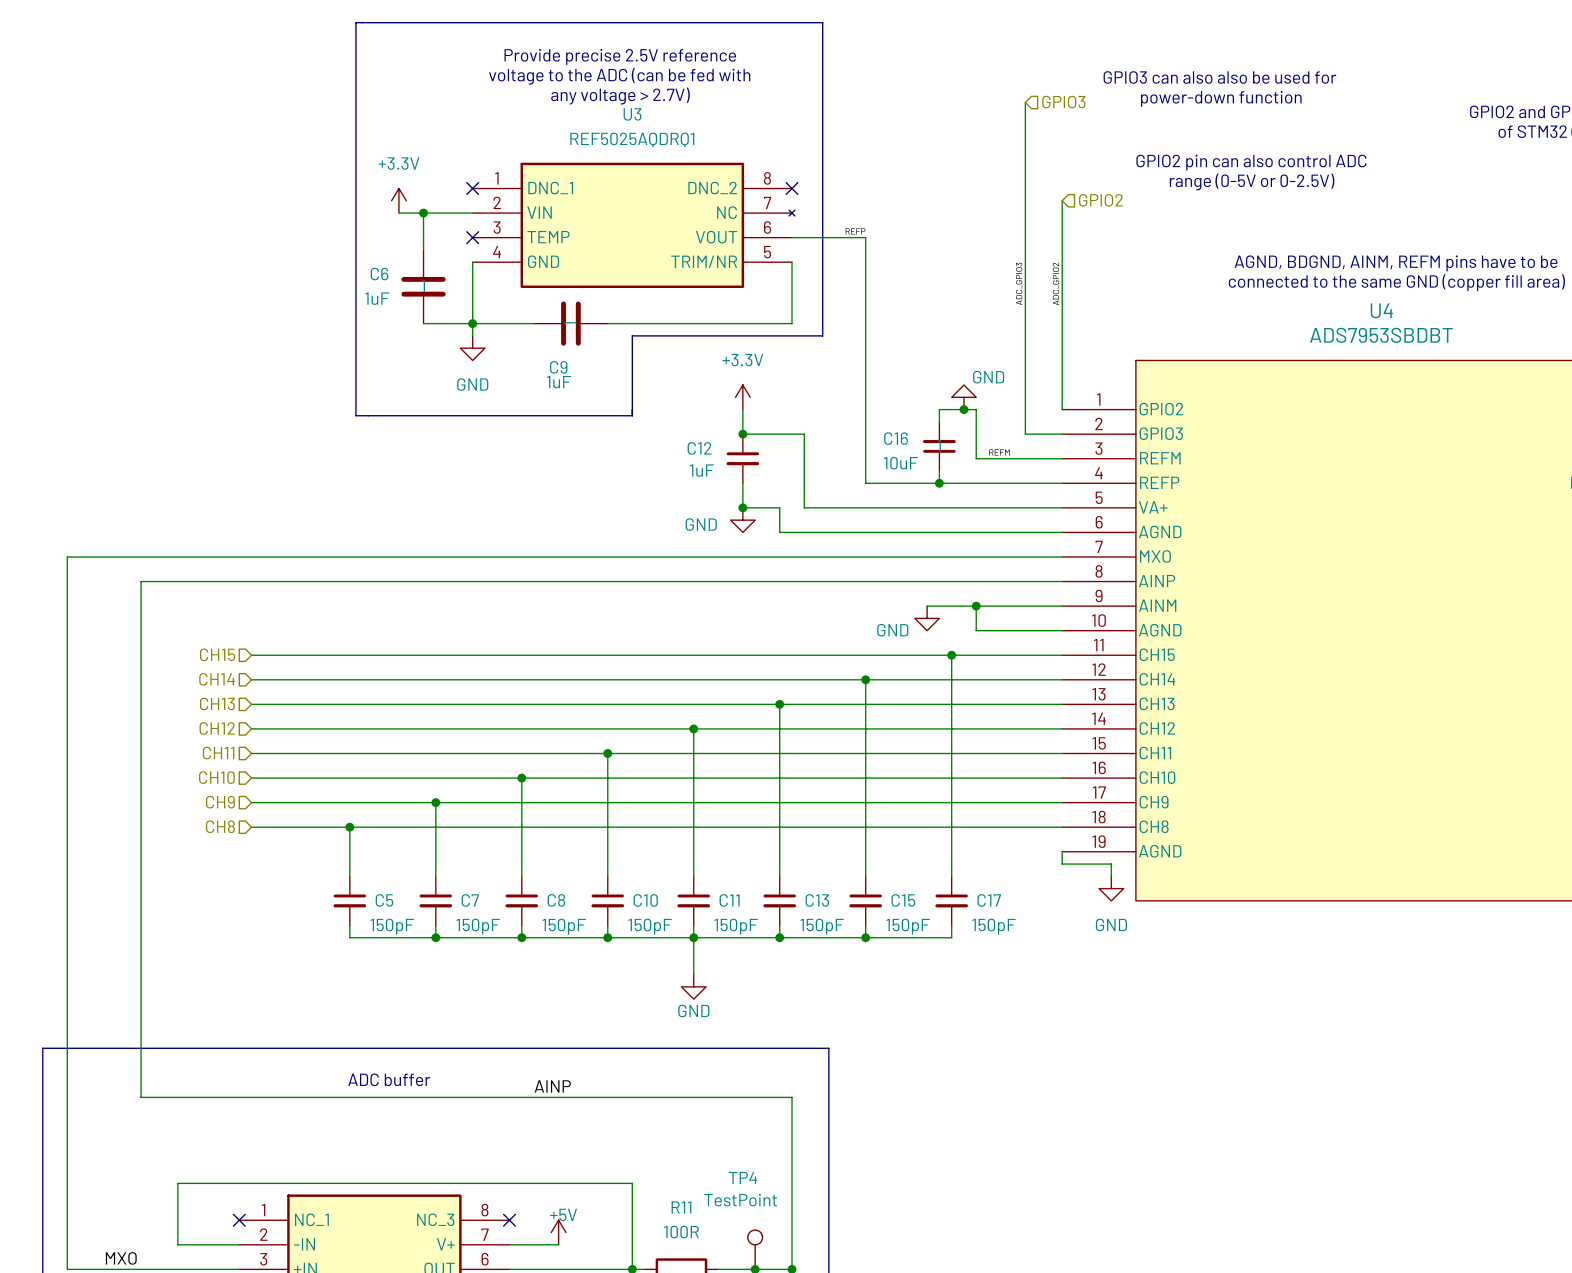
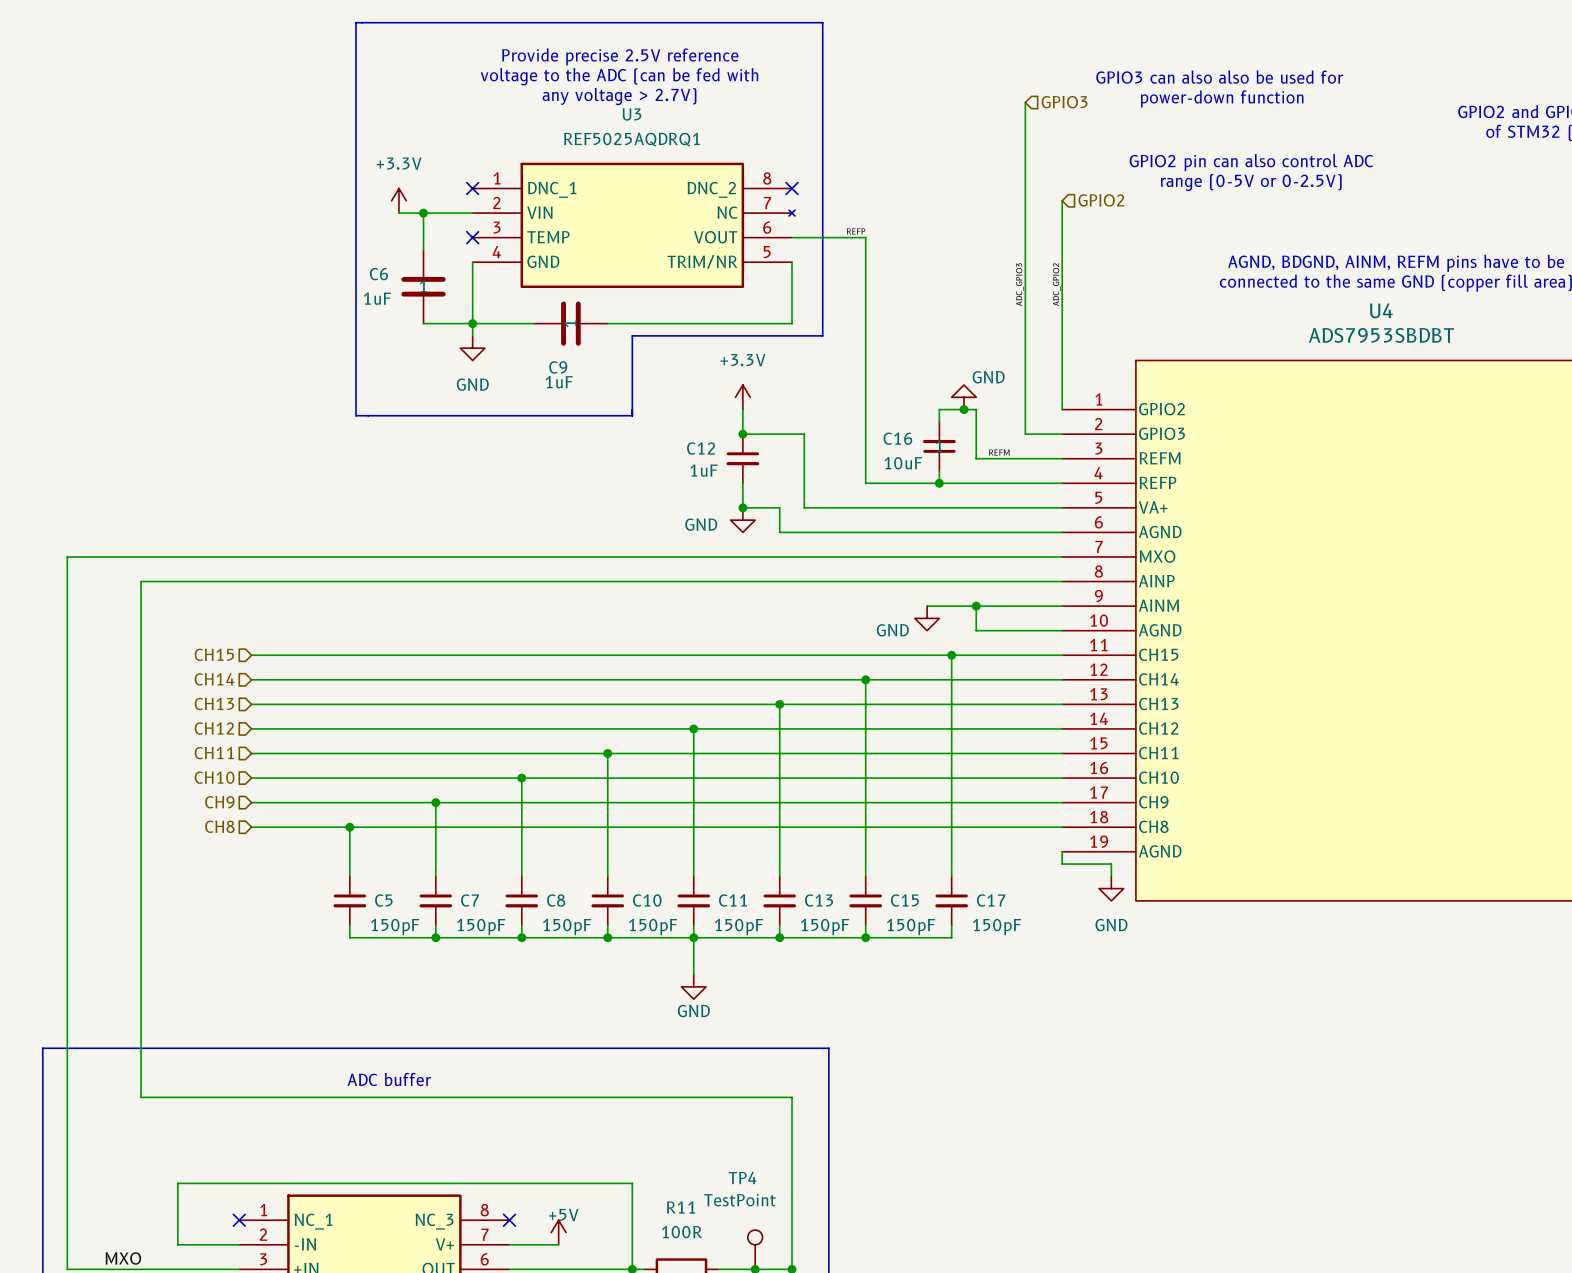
label: AINP (552, 1086) -> none

